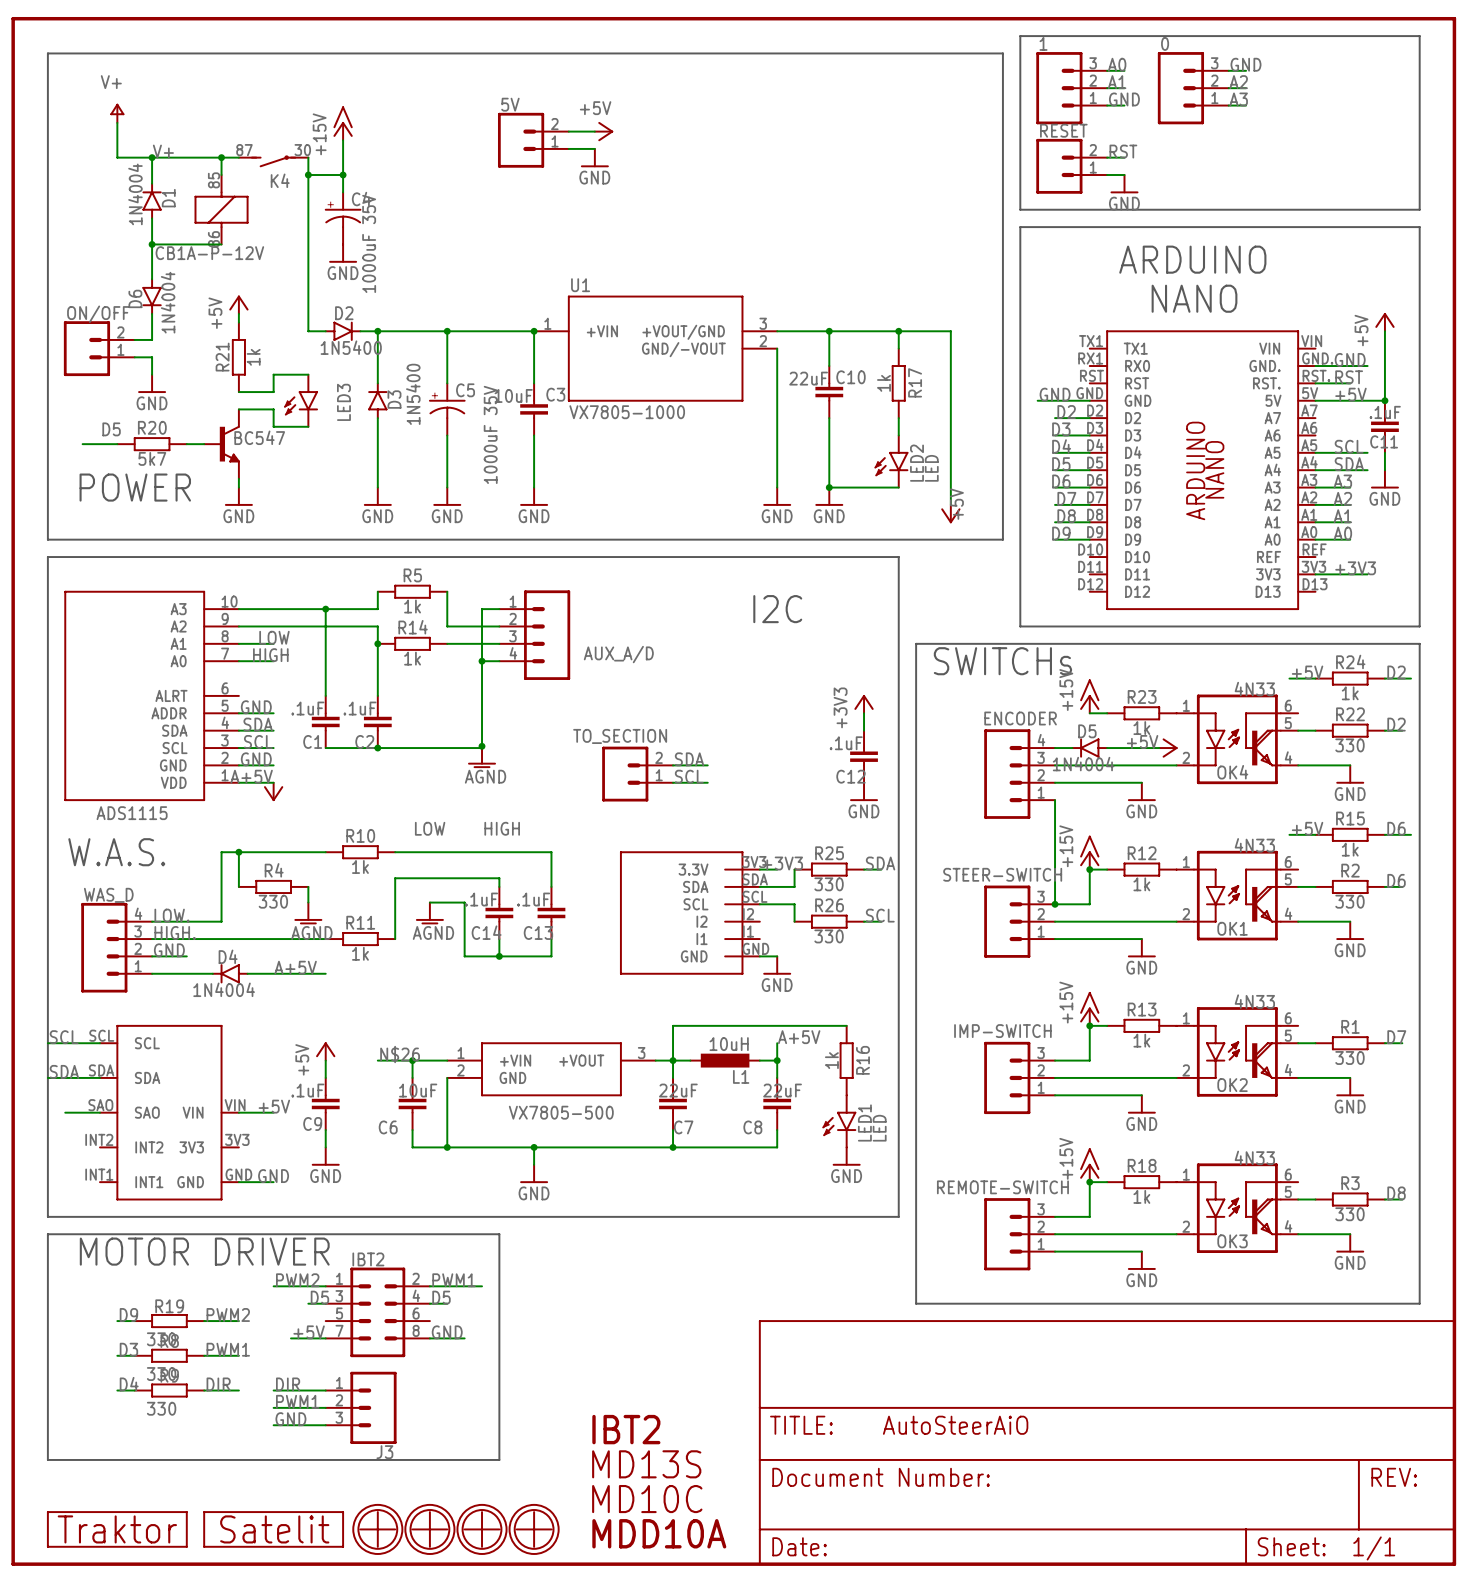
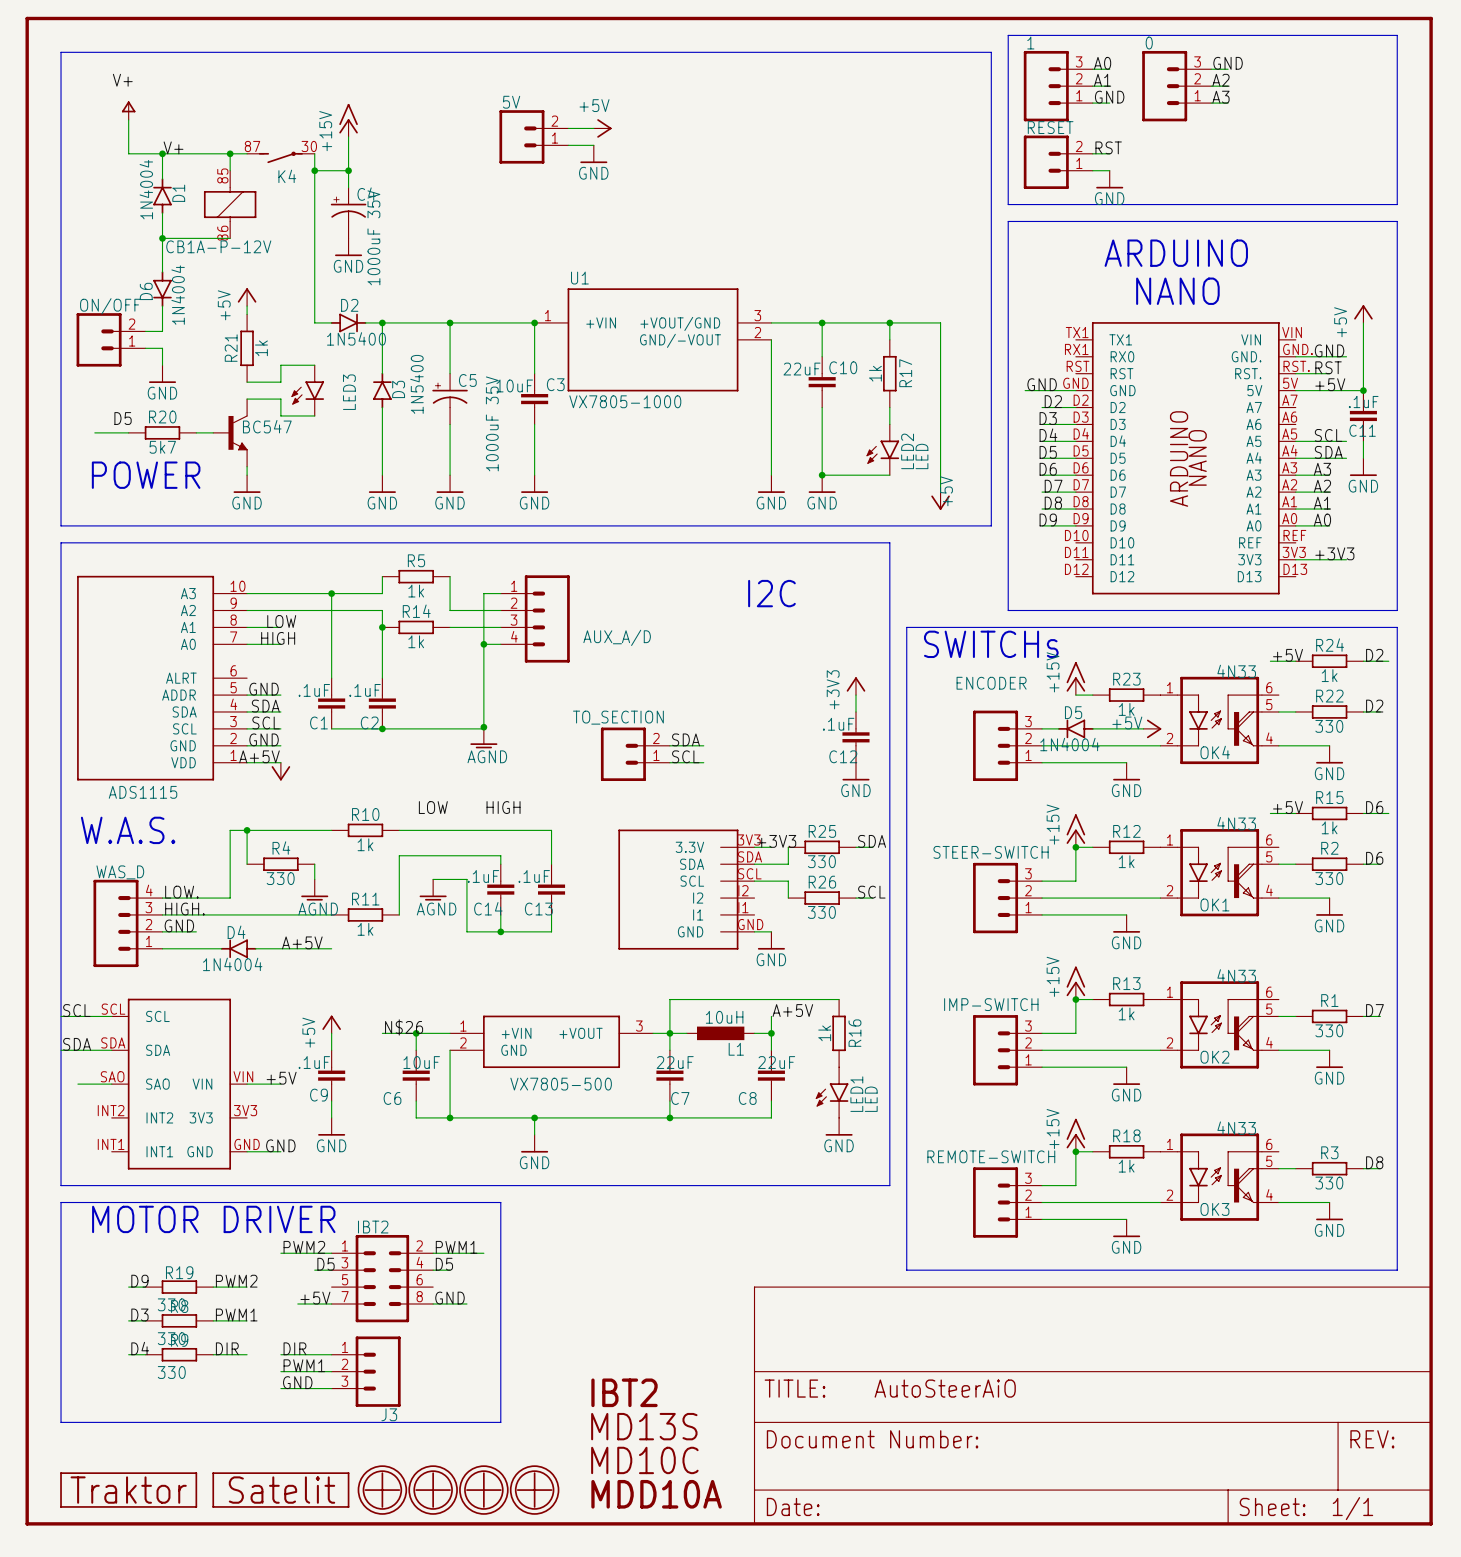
ENCODER: none -> (1007, 745)
ENCODER: (1019, 774) -> none
wire: (1055, 800) (1055, 904) -> none
junction: (1055, 904) -> none

